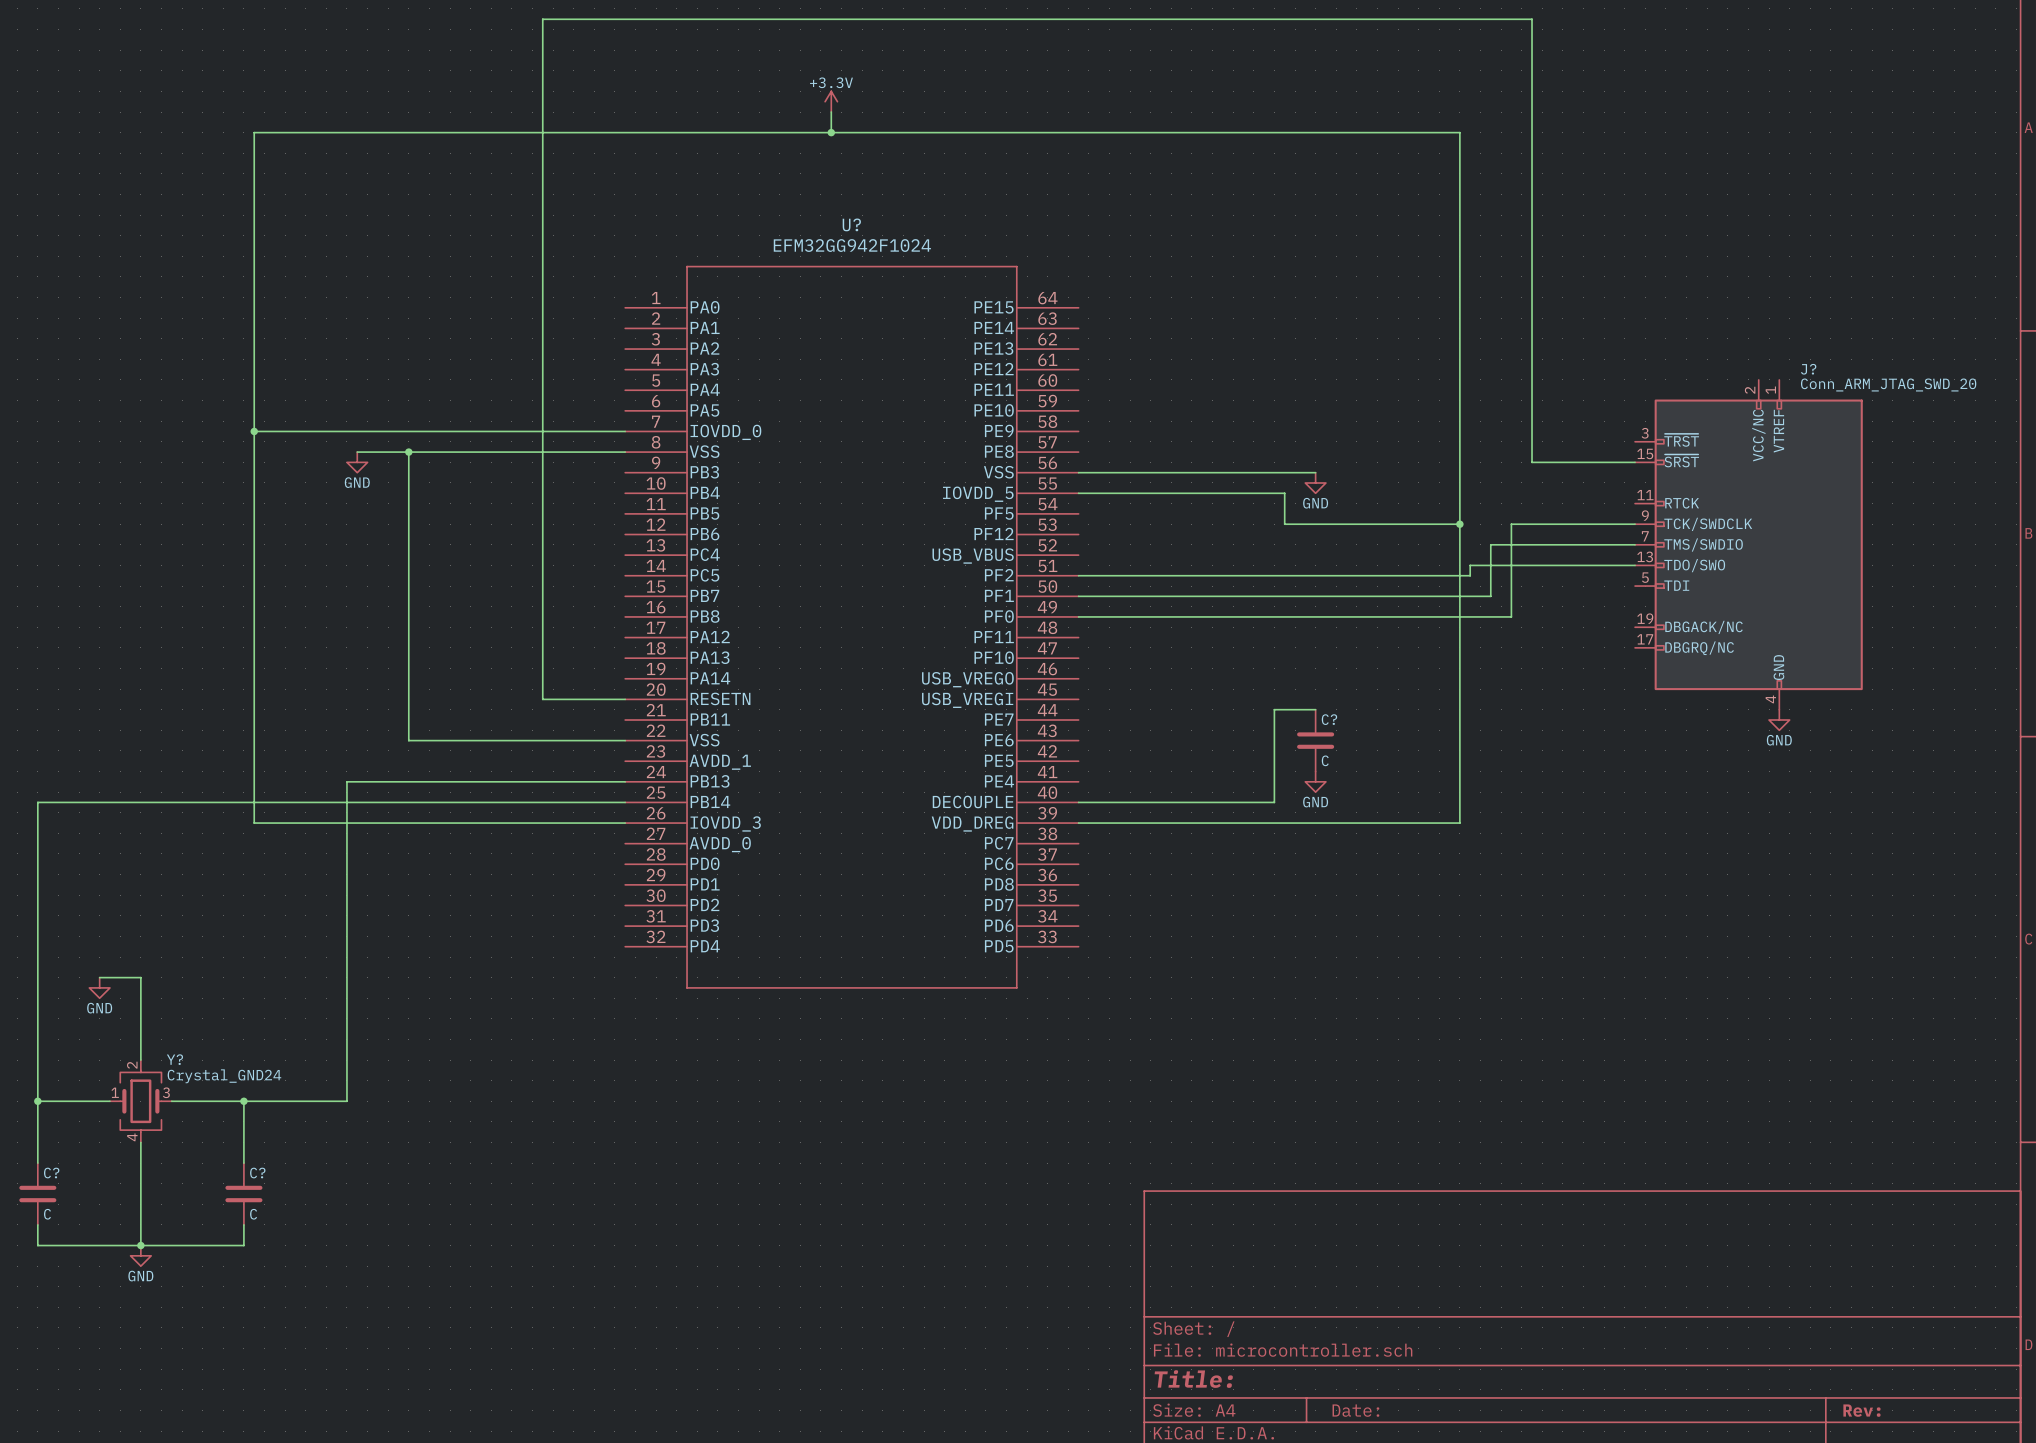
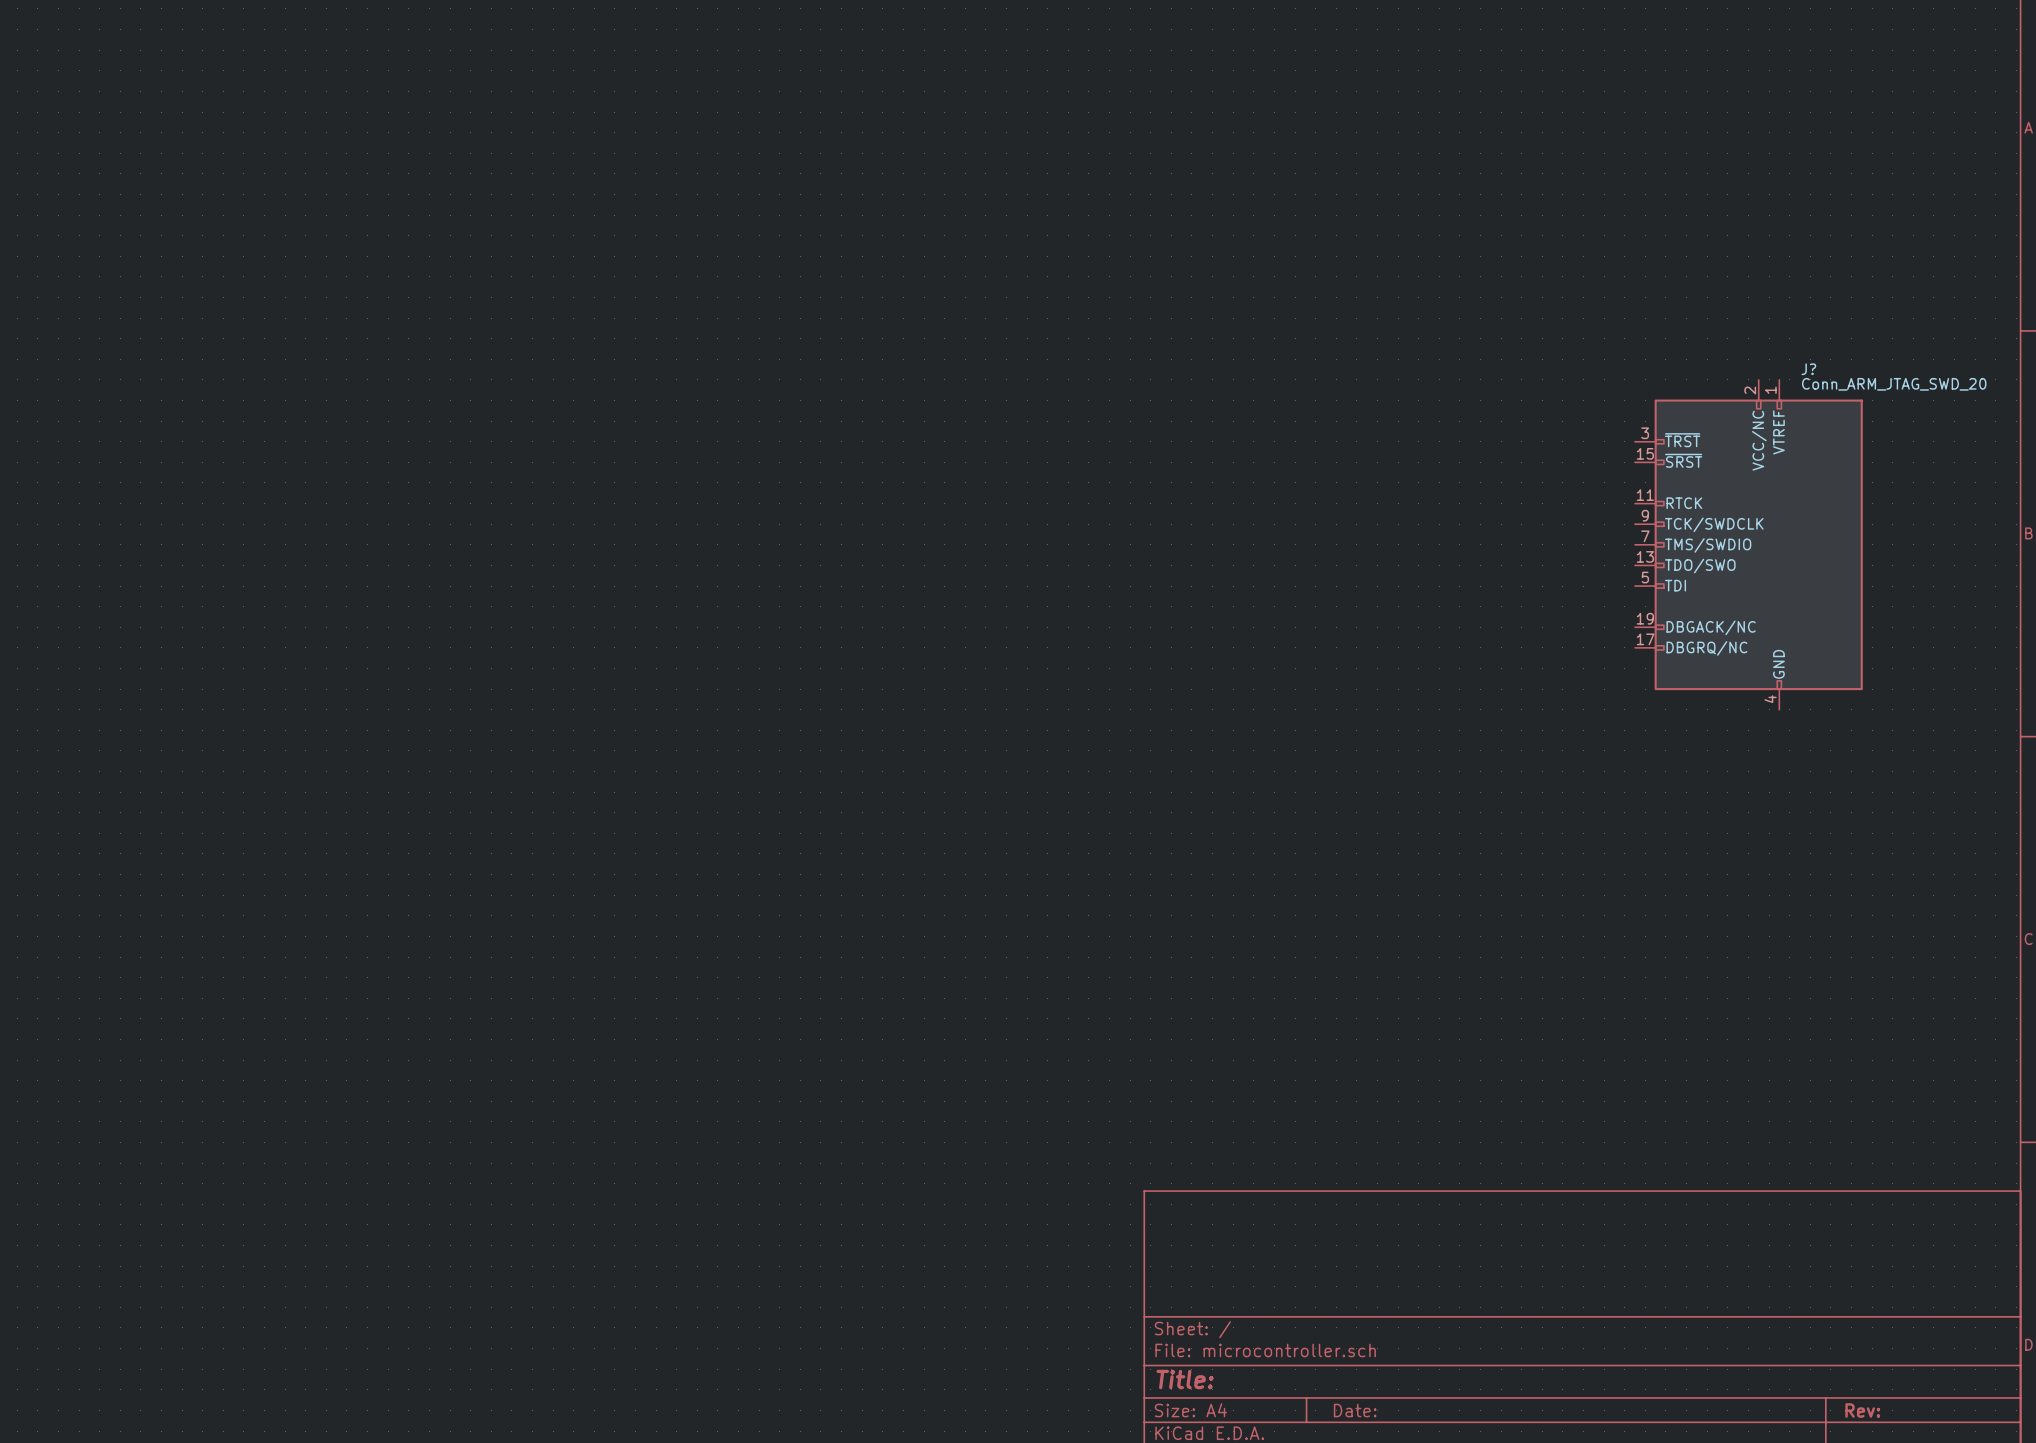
power symbol: +3.3V (831, 101) -> none
wire: (831, 112) (831, 132) -> none
junction: (831, 132) -> none
wire: (254, 431) (625, 431) -> none
junction: (254, 431) -> none
wire: (357, 452) (625, 452) -> none
wire: (408, 452) (408, 740) (625, 740) -> none
junction: (408, 452) -> none
power symbol: GND (357, 462) -> none
wire: (1635, 462) (1532, 462) (1532, 19) (542, 19) (542, 699) (625, 699) -> none
wire: (1078, 472) (1315, 472) -> none
power symbol: GND (1315, 482) -> none
wire: (1078, 493) (1284, 493) (1284, 524) (1459, 524) -> none
junction: (1459, 524) -> none
wire: (1635, 524) (1511, 524) (1511, 616) (1078, 616) -> none
wire: (1635, 544) (1490, 544) (1490, 596) (1078, 596) -> none
wire: (1635, 565) (1470, 565) (1470, 575) (1078, 575) -> none
U?: EFM32GG942F1024 (851, 627) -> none
wire: (1315, 709) (1274, 709) (1274, 802) (1078, 802) -> none
power symbol: GND (1779, 720) -> none
C?: C (1315, 740) -> none
wire: (625, 781) (346, 781) (346, 1101) (171, 1101) -> none
power symbol: GND (1315, 781) -> none
wire: (625, 802) (37, 802) (37, 1163) -> none
wire: (625, 823) (254, 823) (254, 132) (1459, 132) (1459, 823) (1078, 823) -> none
wire: (99, 977) (140, 977) (140, 1060) -> none
power symbol: GND (99, 987) -> none
wire: (37, 1101) (109, 1101) -> none
junction: (37, 1101) -> none
Y?: Crystal_GND24 (140, 1101) -> none
wire: (243, 1101) (243, 1163) -> none
junction: (243, 1101) -> none
wire: (140, 1142) (140, 1245) -> none
C?: C (37, 1194) -> none
C?: C (243, 1194) -> none
wire: (37, 1224) (37, 1245) (243, 1245) (243, 1224) -> none
junction: (140, 1245) -> none
power symbol: GND (140, 1255) -> none

